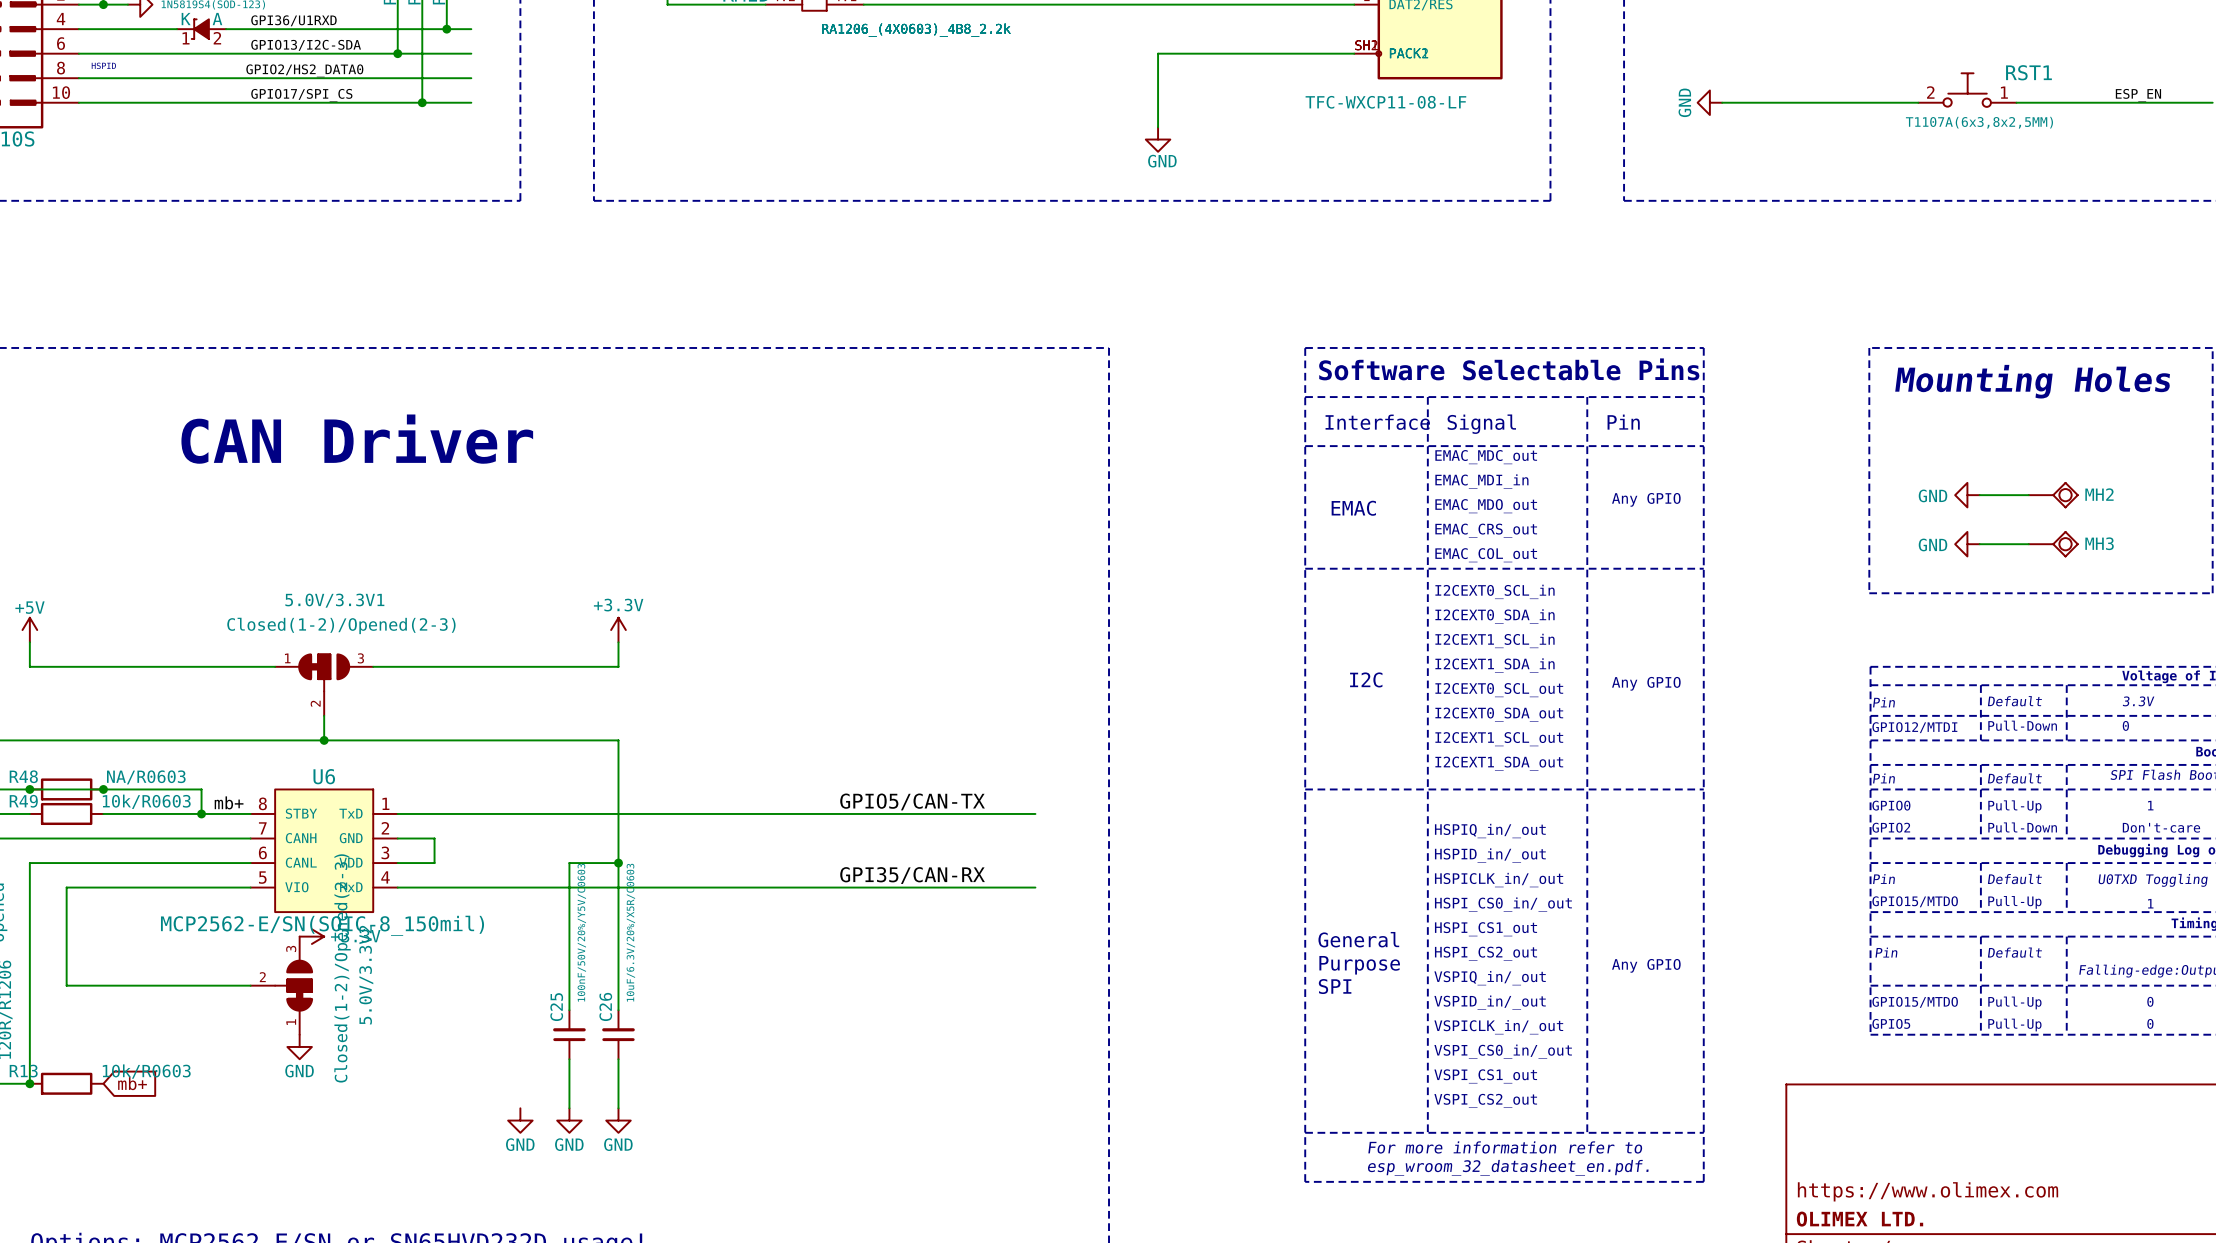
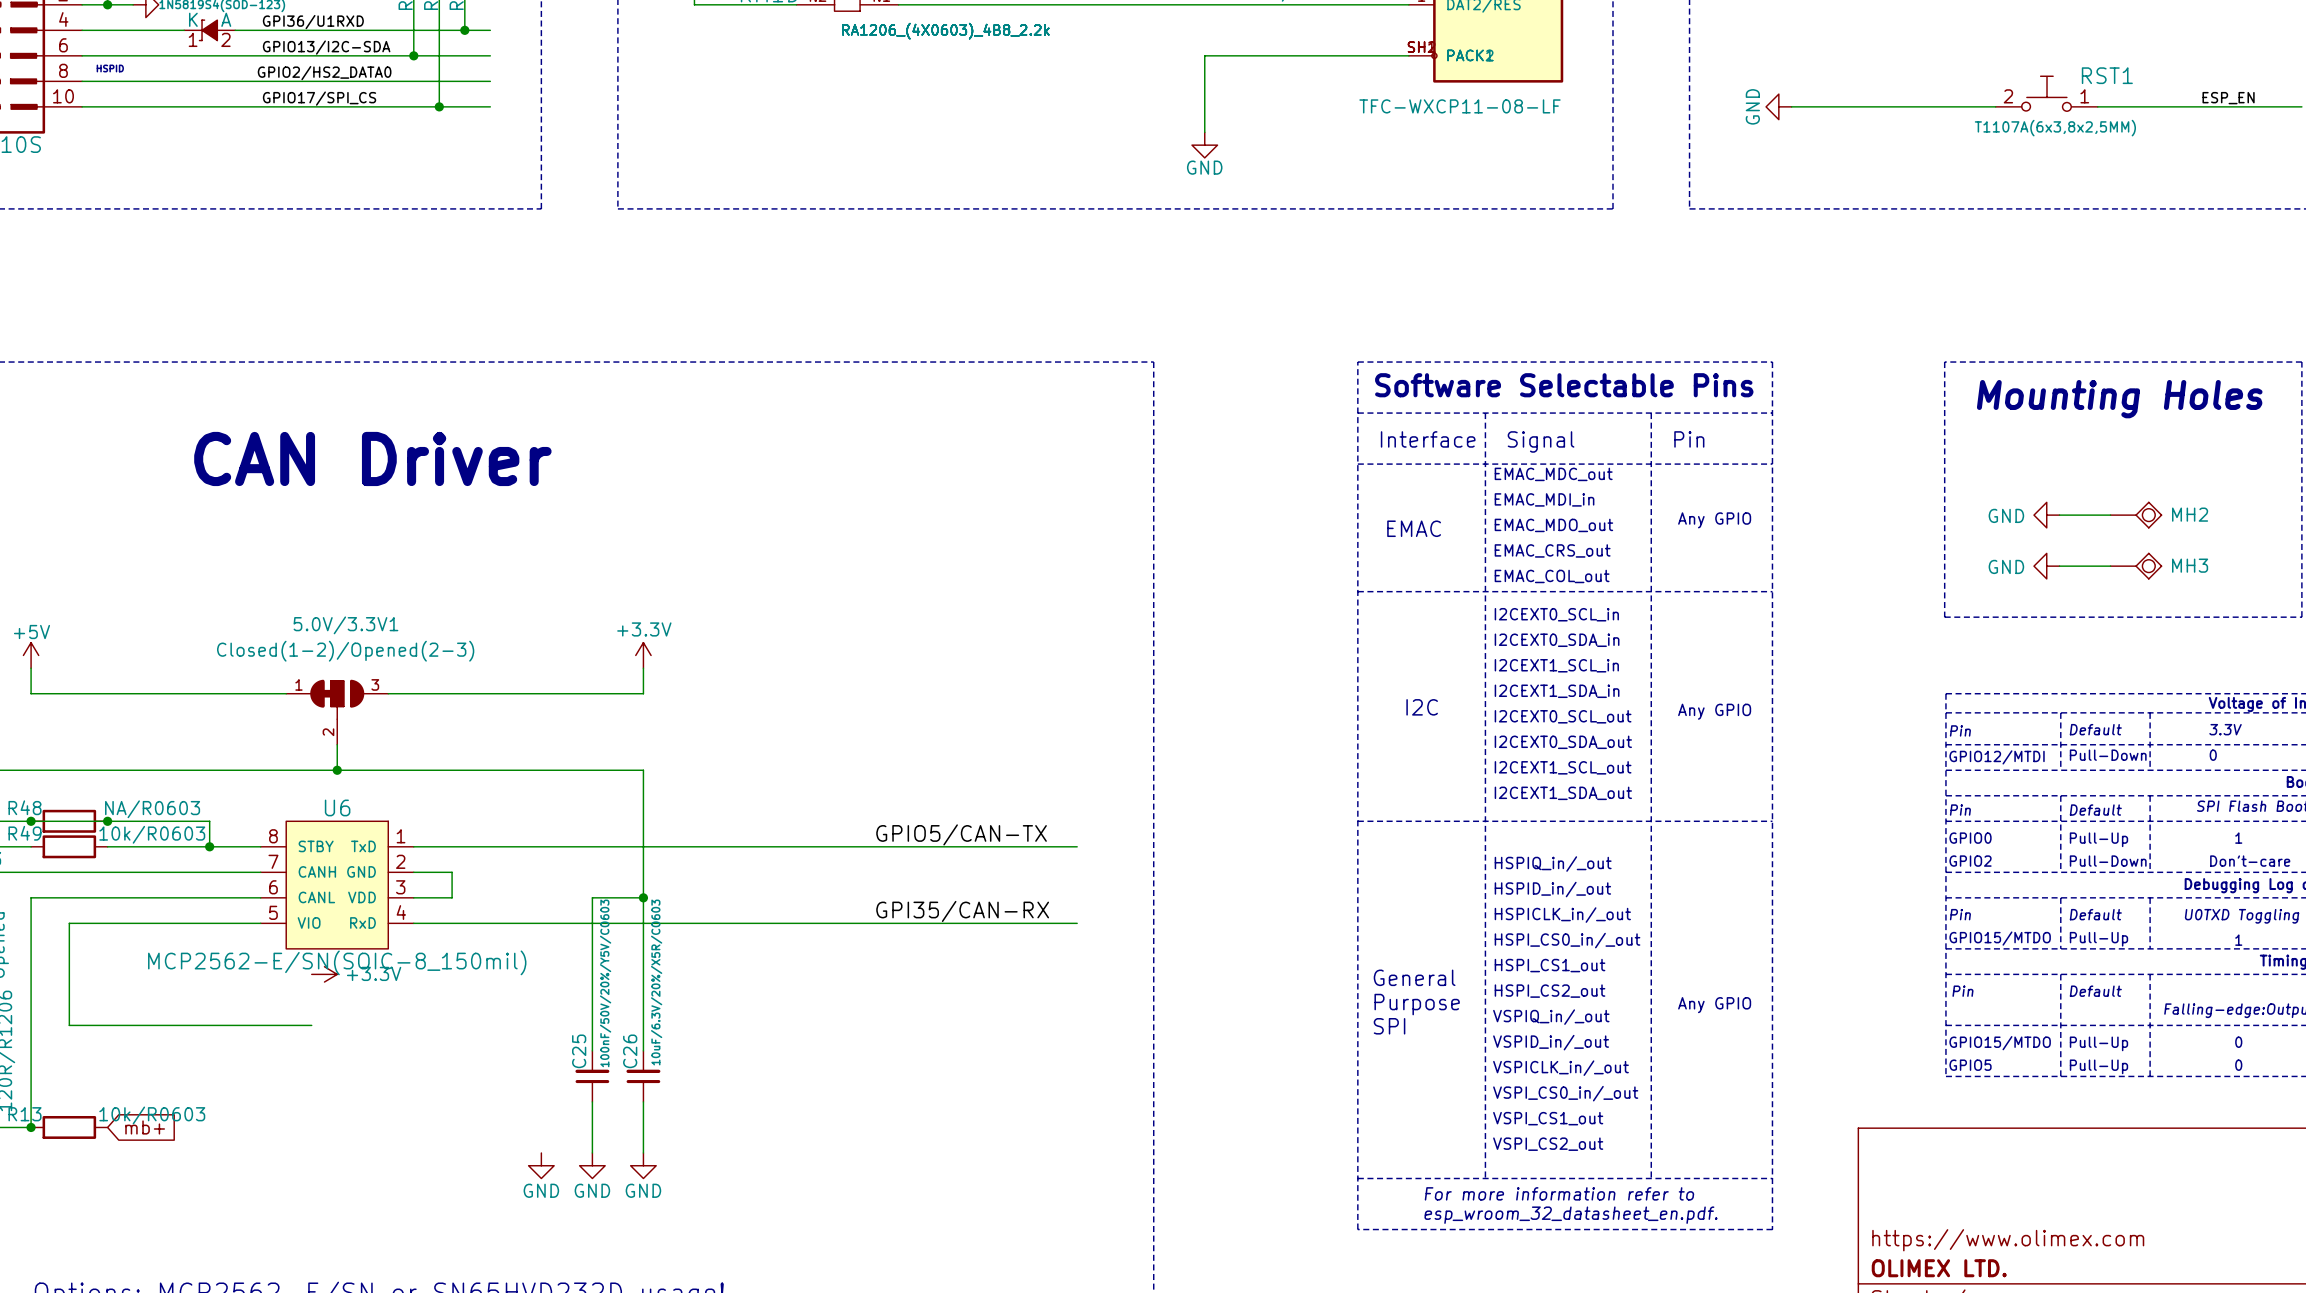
label: mb+ (229, 802) -> none
5.0V/3.3V2: Closed(1-2)/Opened(2-3) (281, 985) -> none
power symbol: GND (299, 1046) -> none

